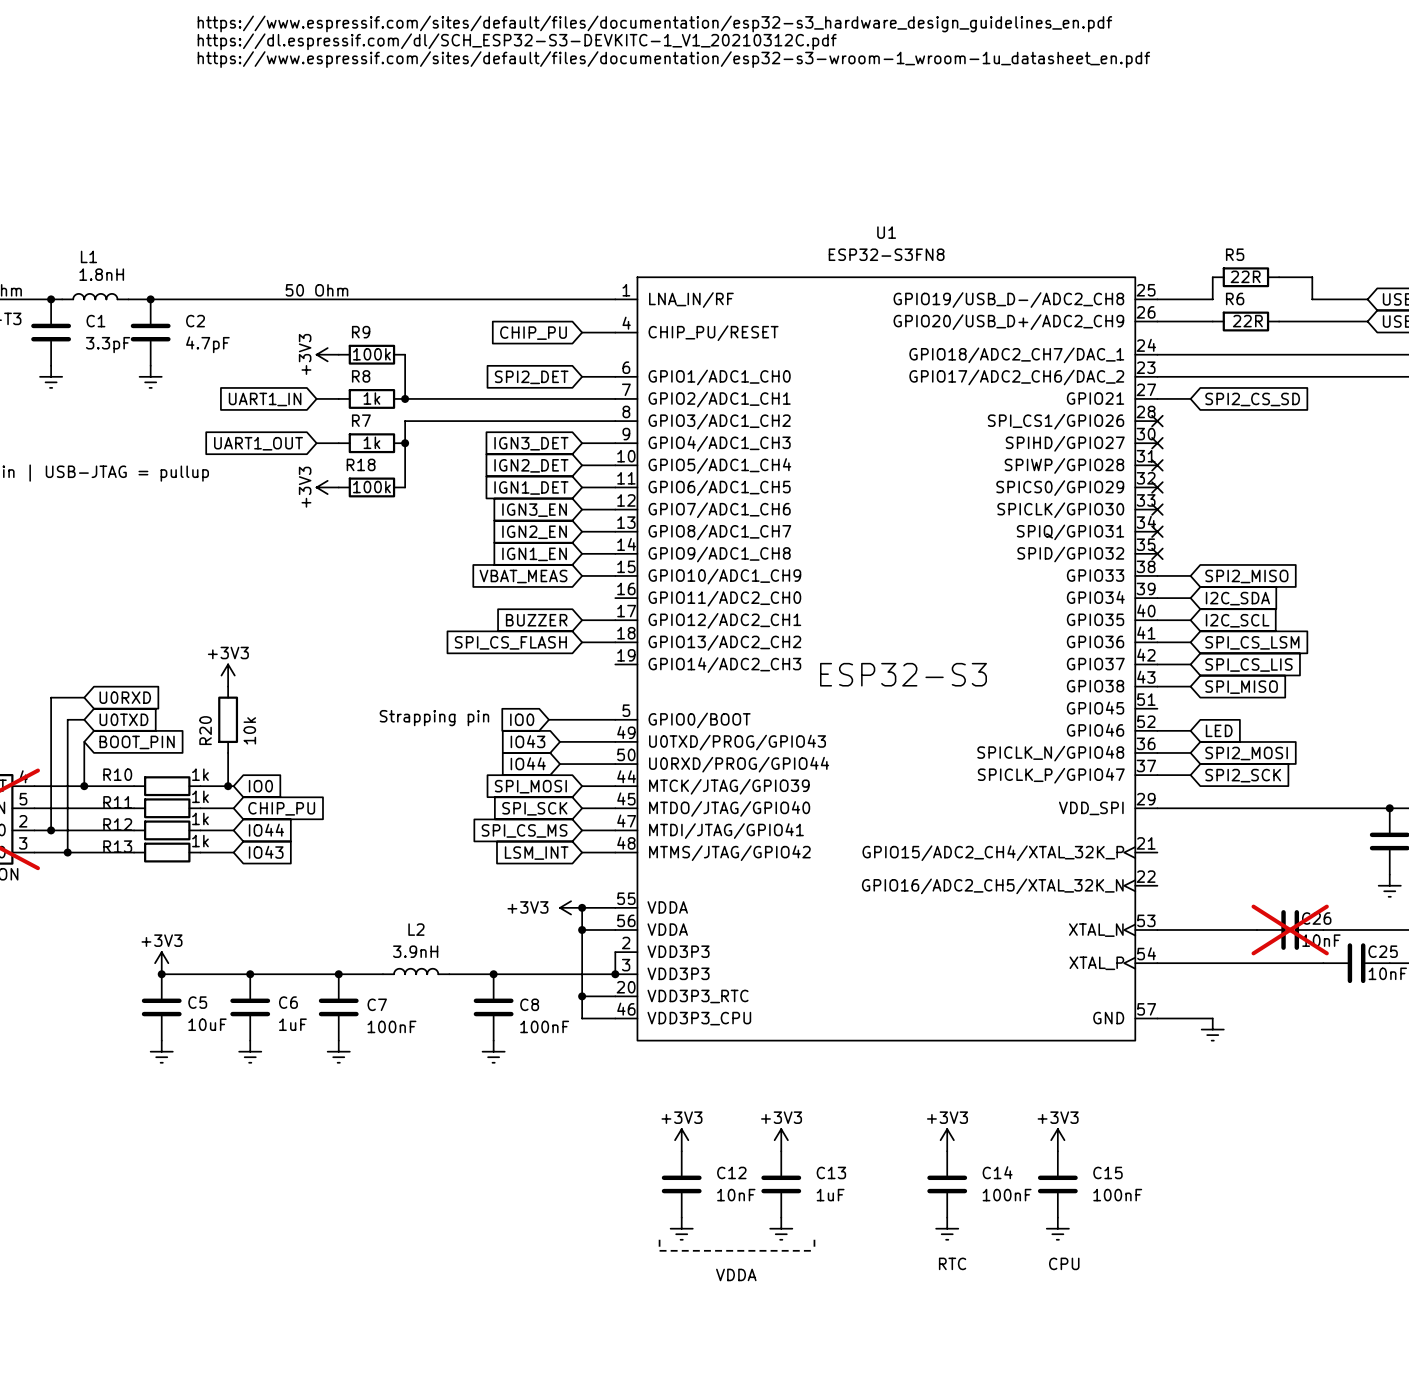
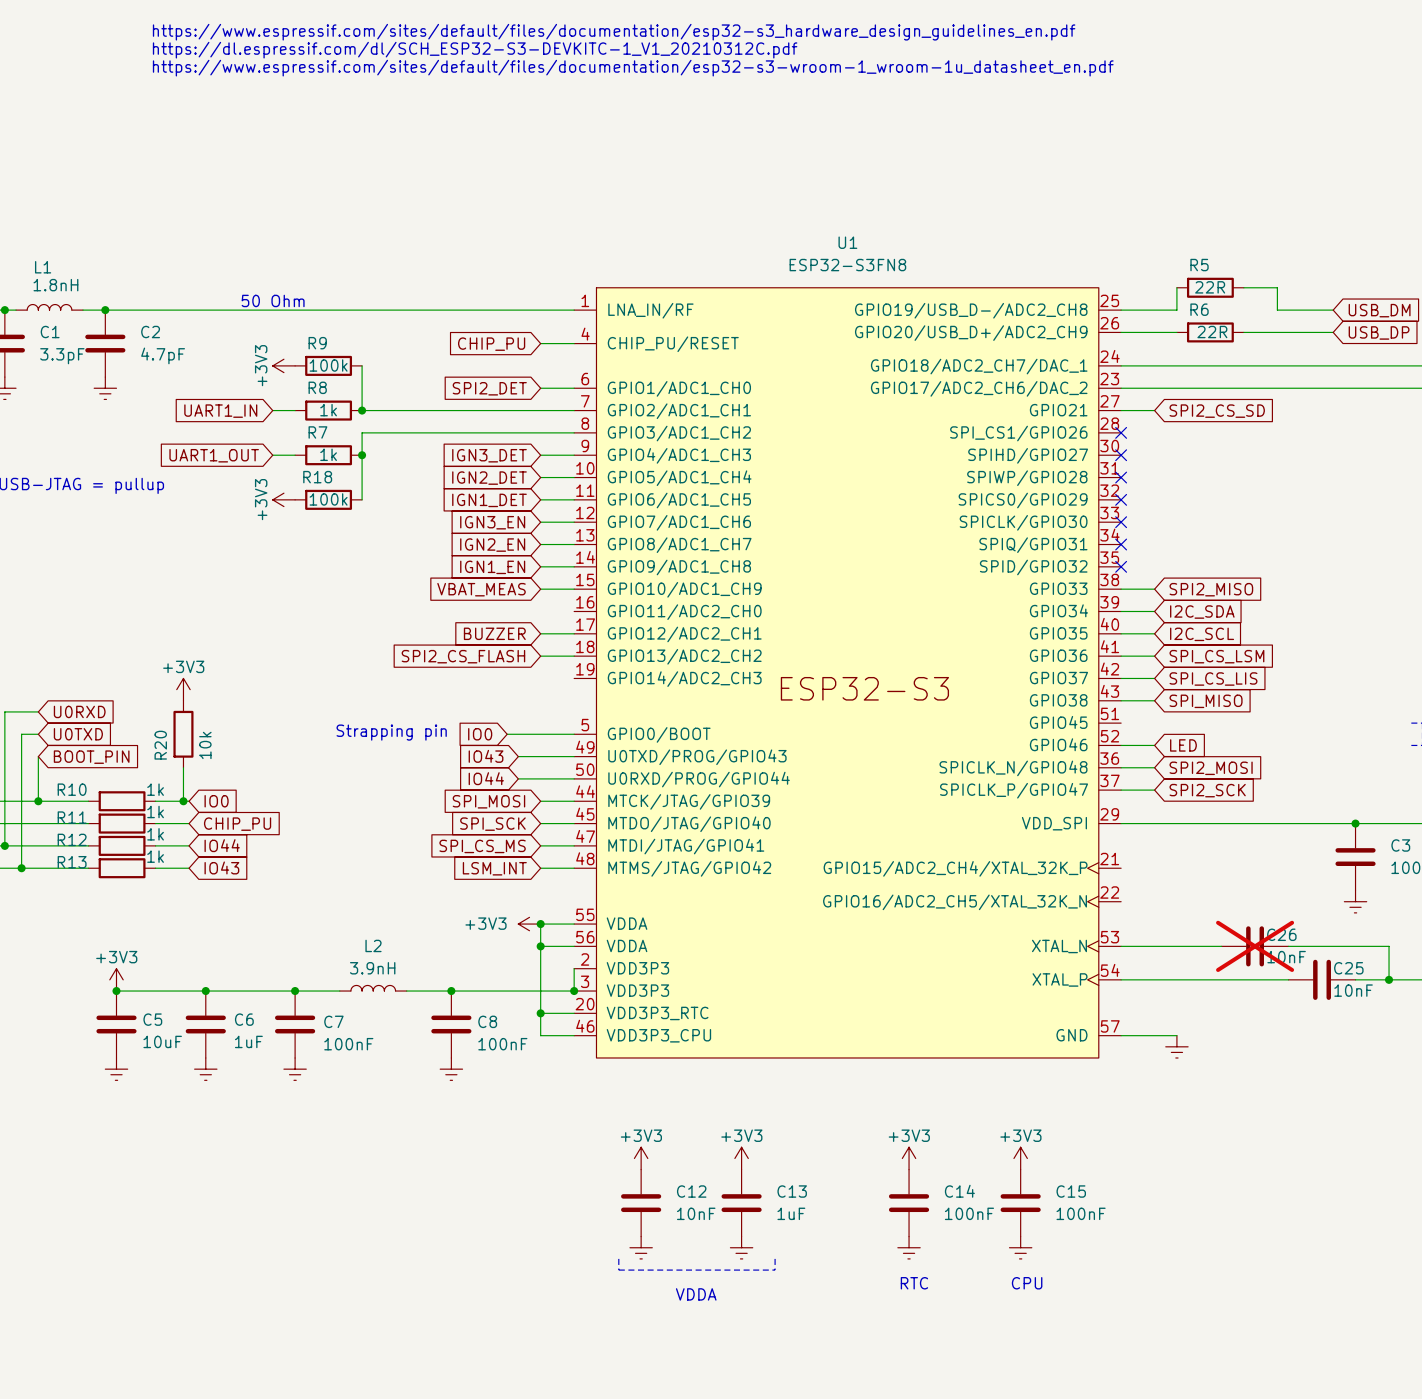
global label: SPI_CS_FLASH (510, 642) -> SPI2_CS_FLASH (463, 656)

